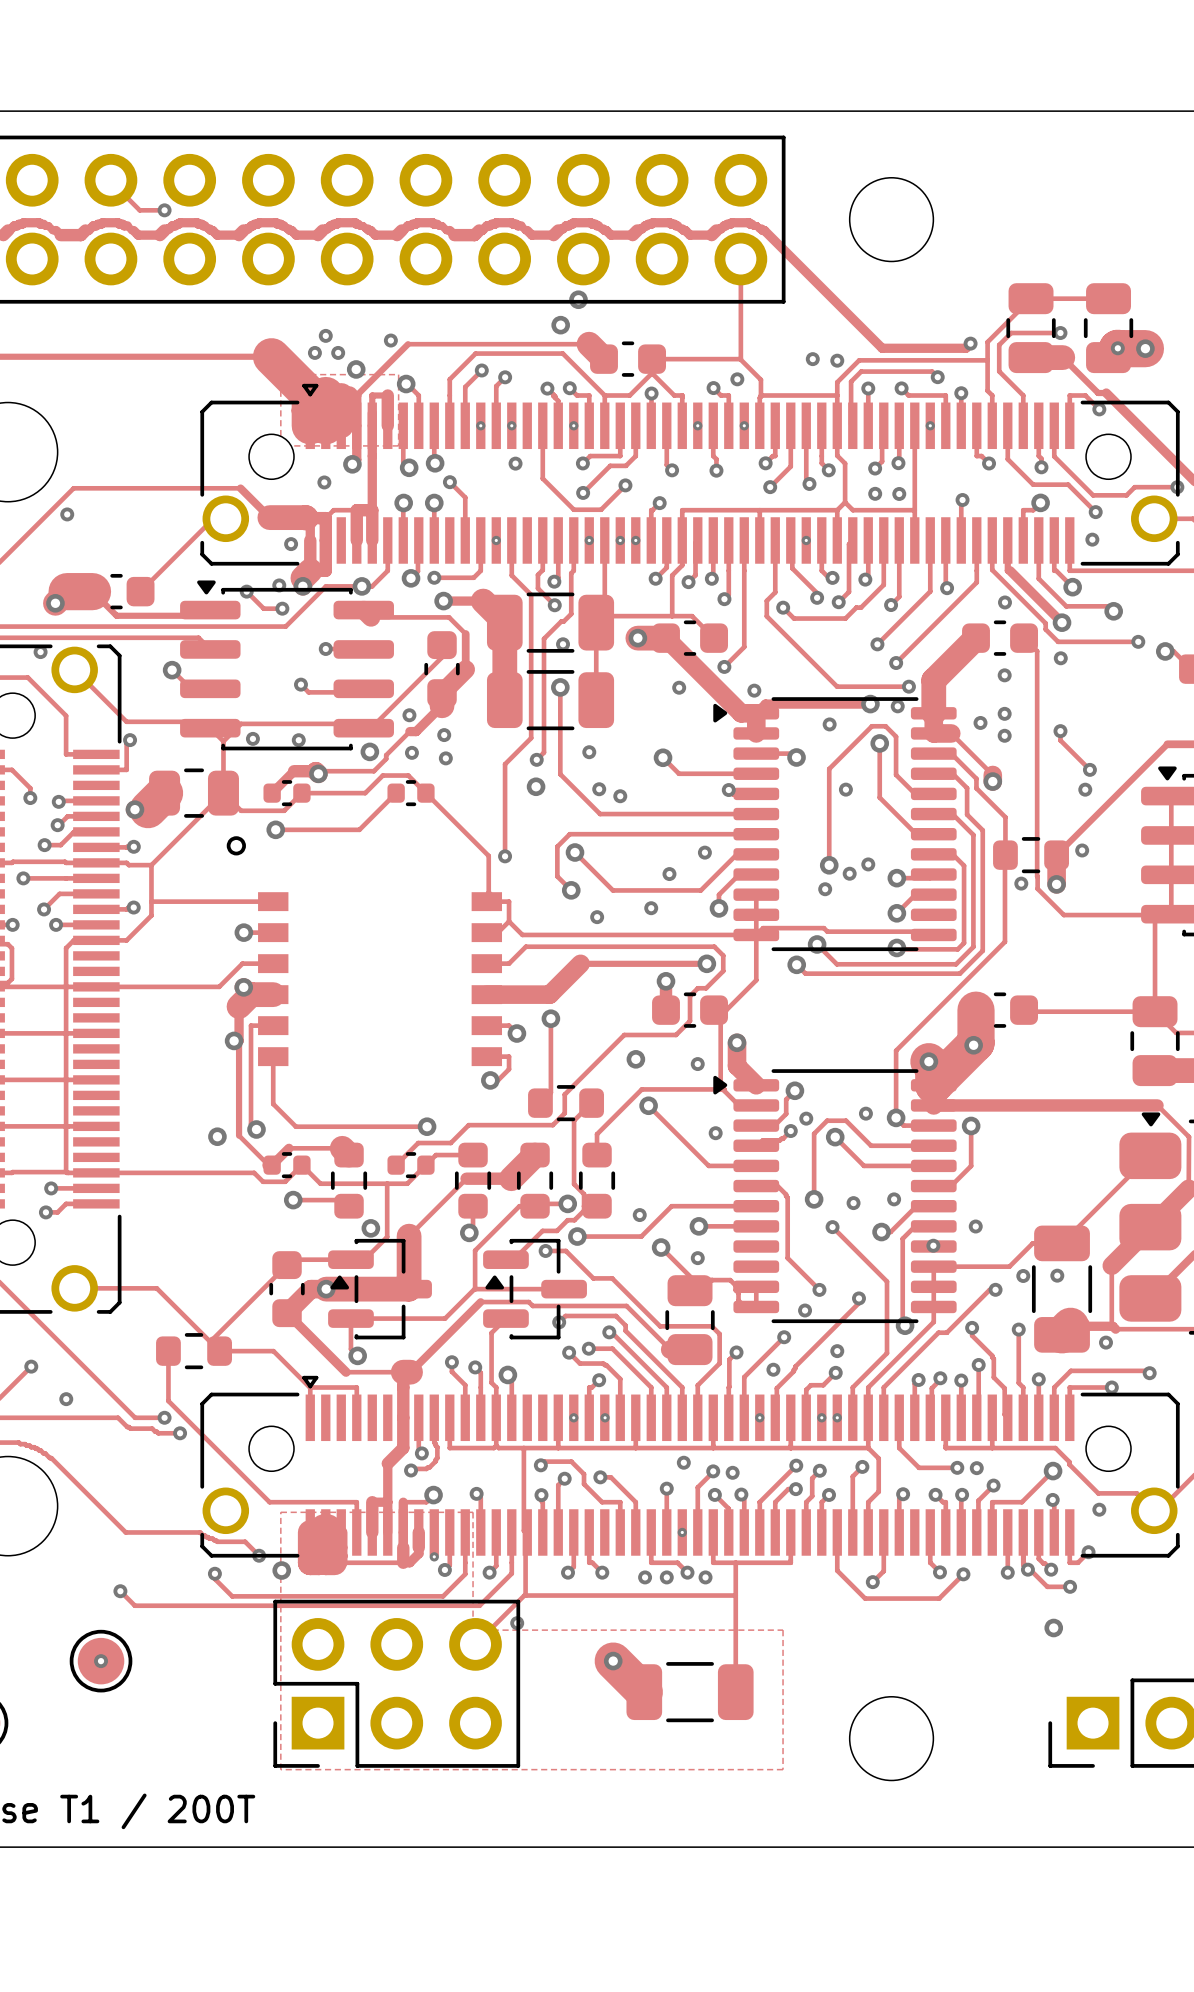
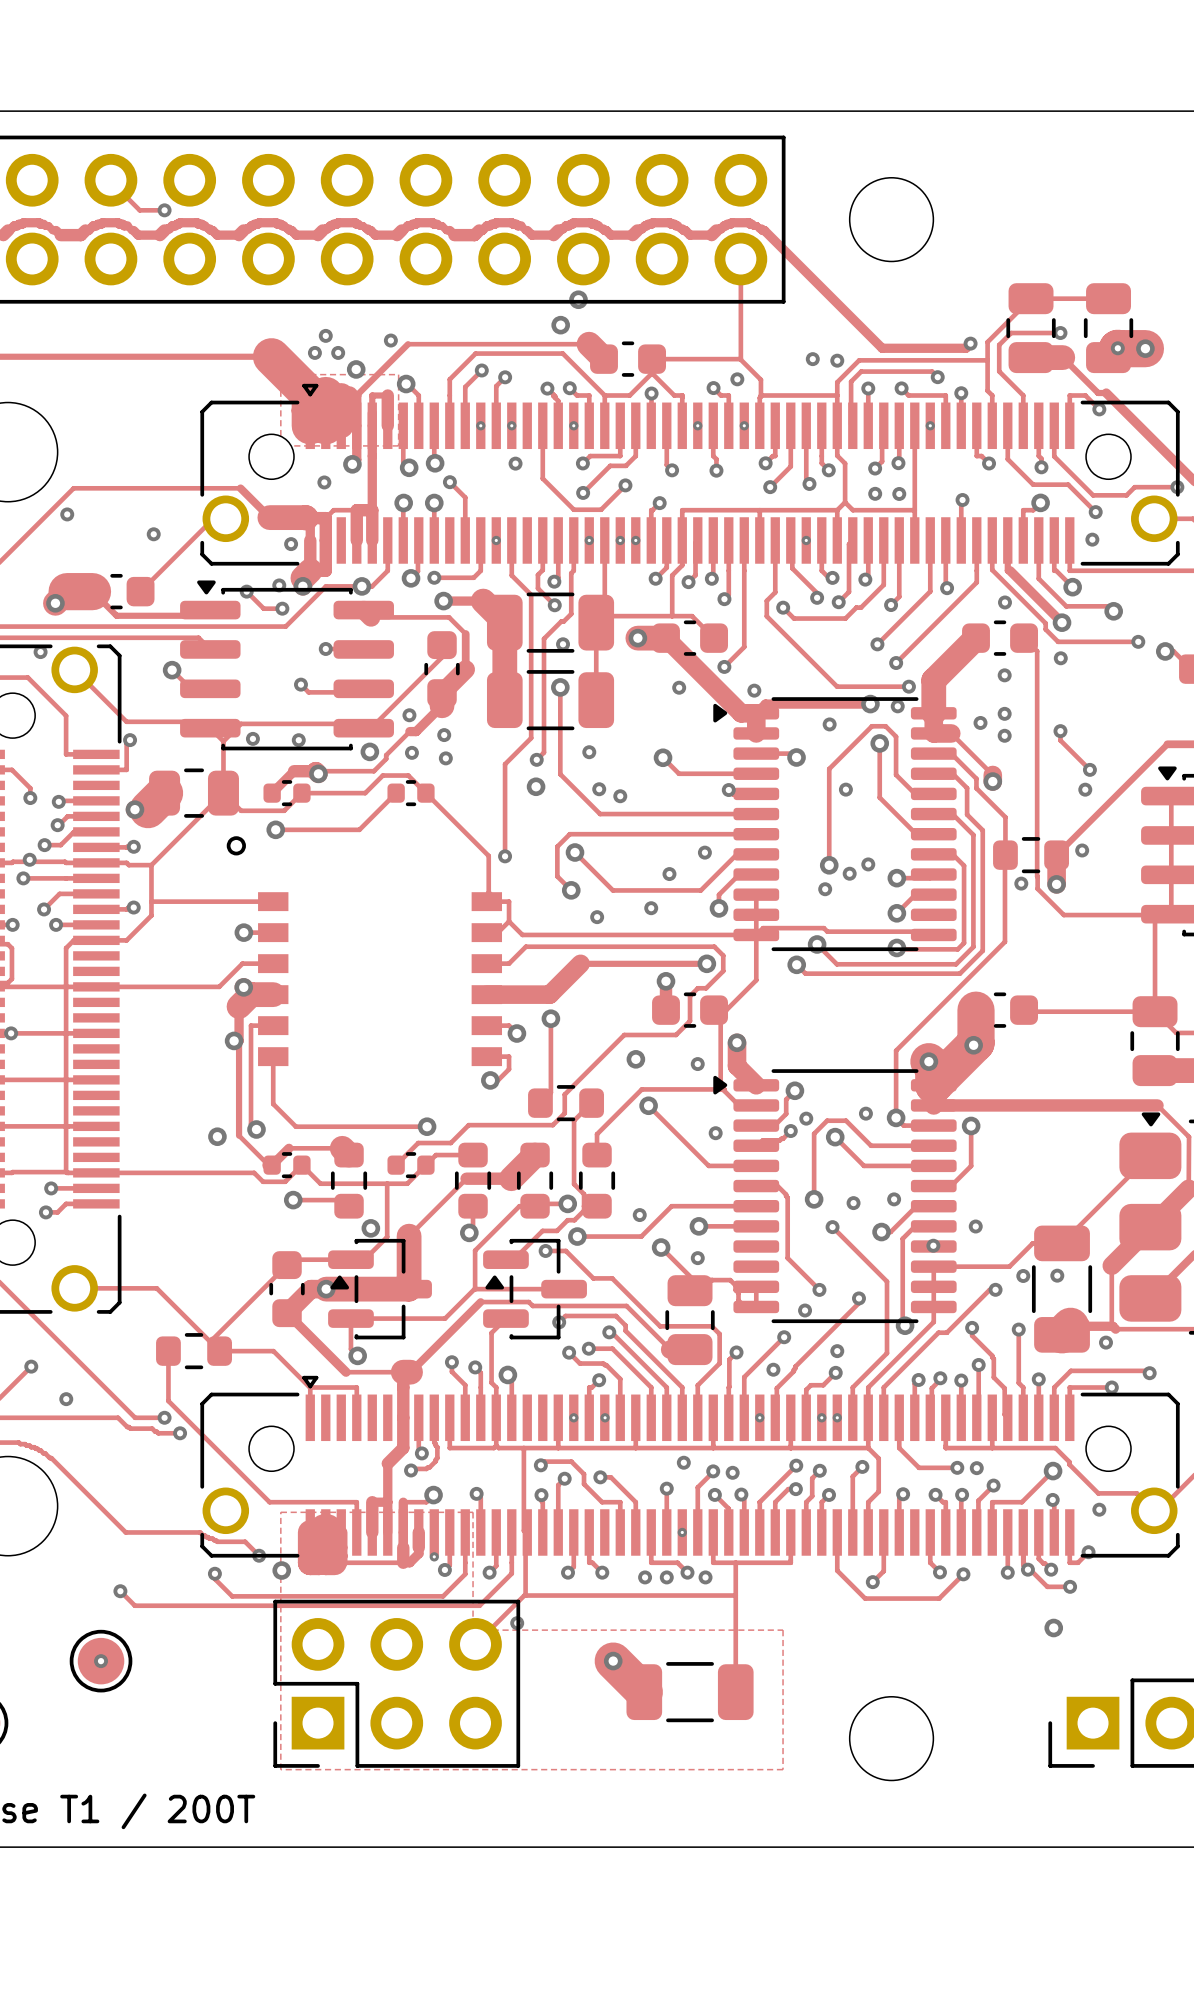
via: none -> (153, 534)
via: none -> (29, 859)
via: none -> (11, 1033)

